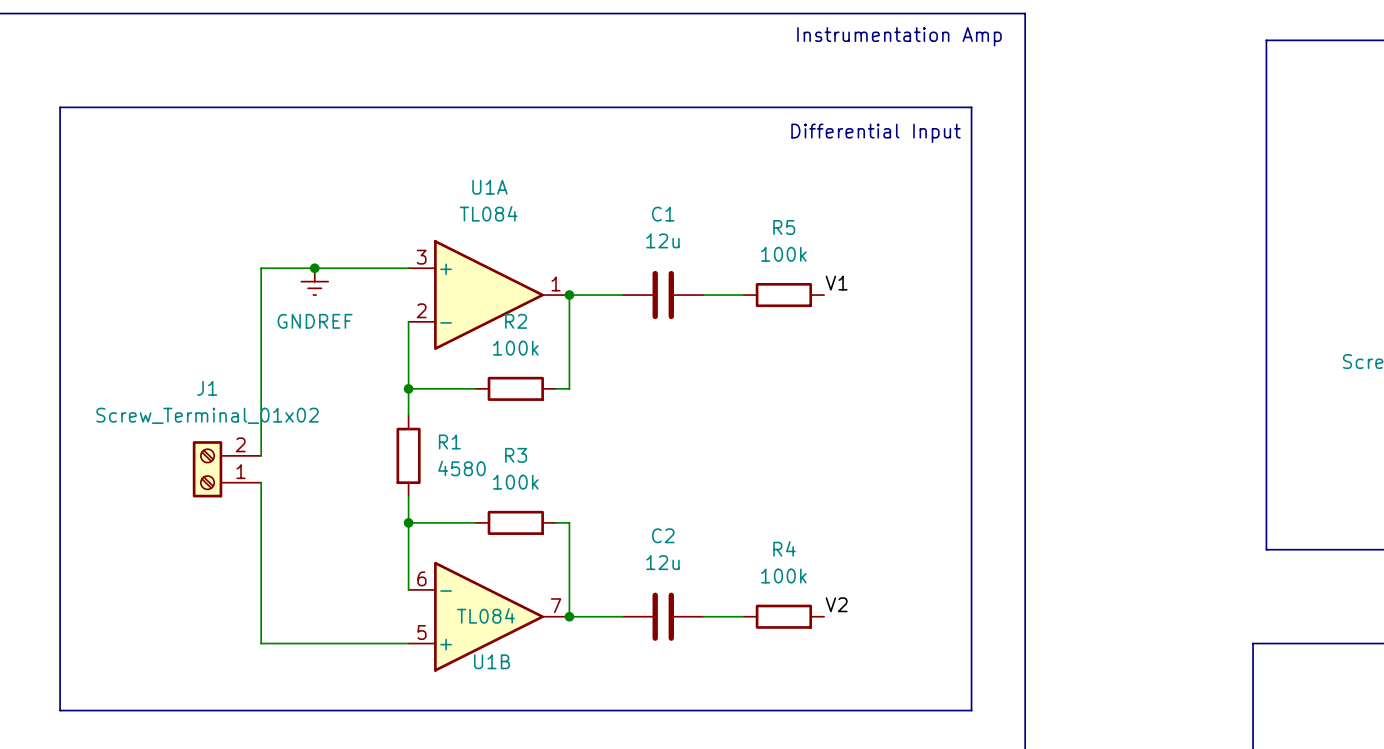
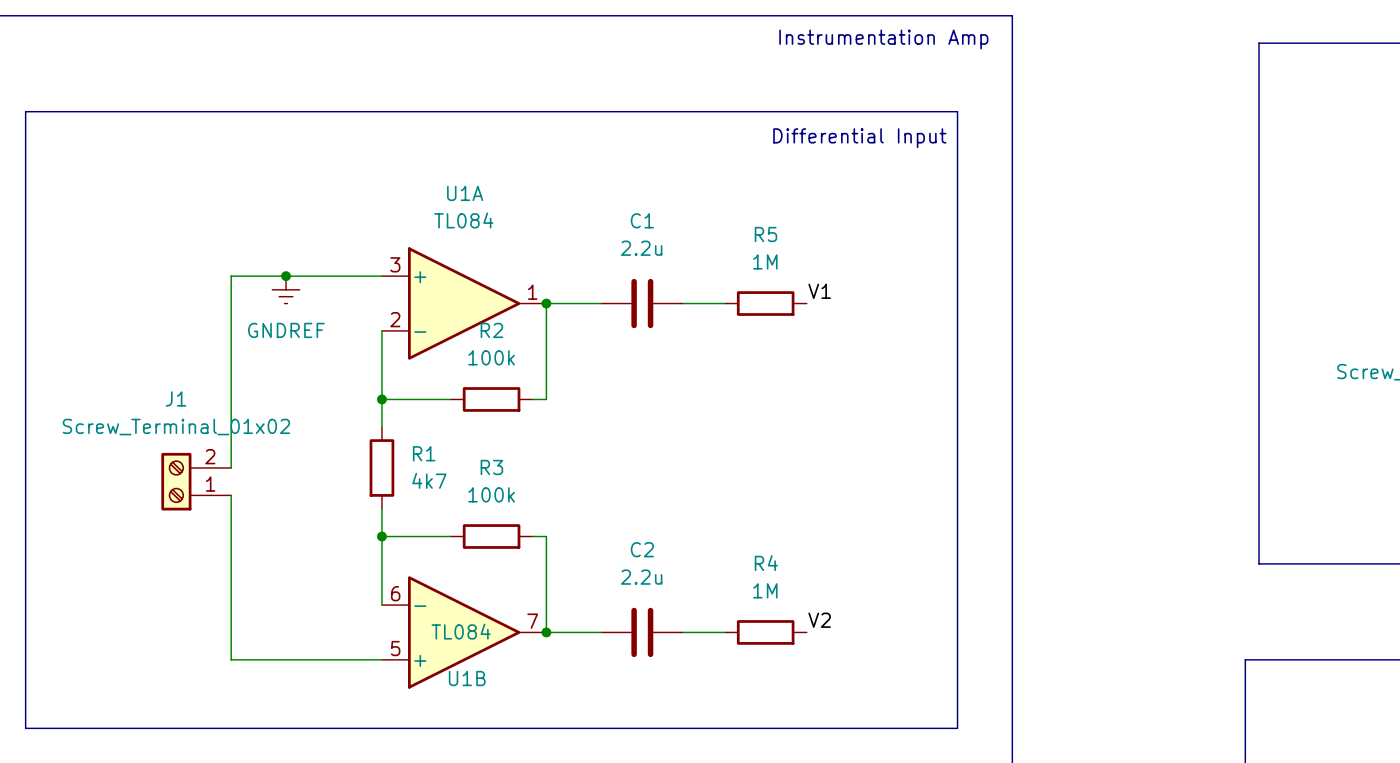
C1 value: 12u (662, 240) -> 2.2u (641, 248)
R5 value: 100k (783, 254) -> 1M (765, 261)
R1 value: 4580 (461, 468) -> 4k7 (429, 480)
C2 value: 12u (662, 562) -> 2.2u (641, 577)
R4 value: 100k (783, 576) -> 1M (765, 590)

